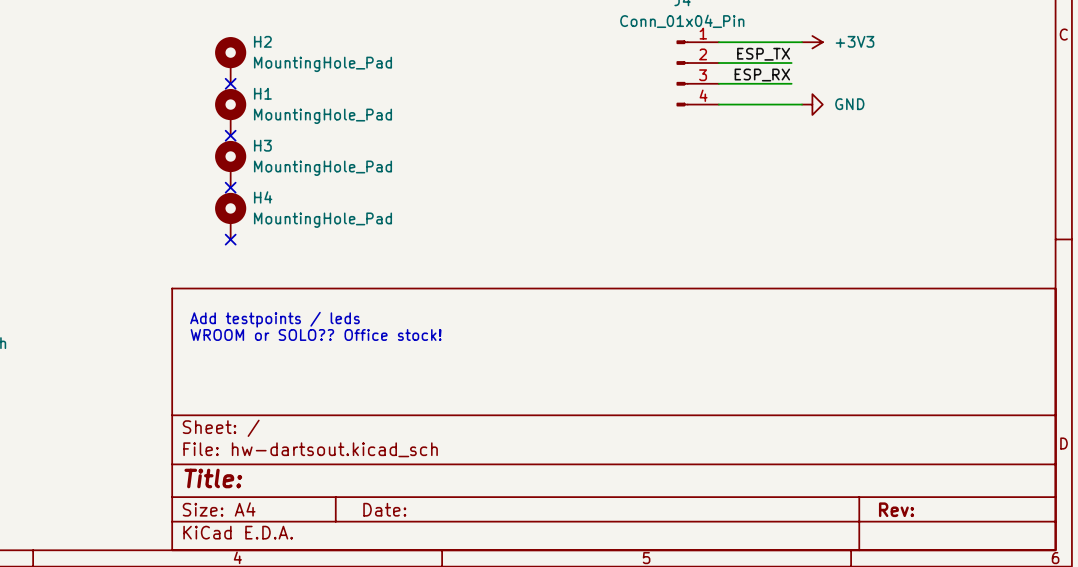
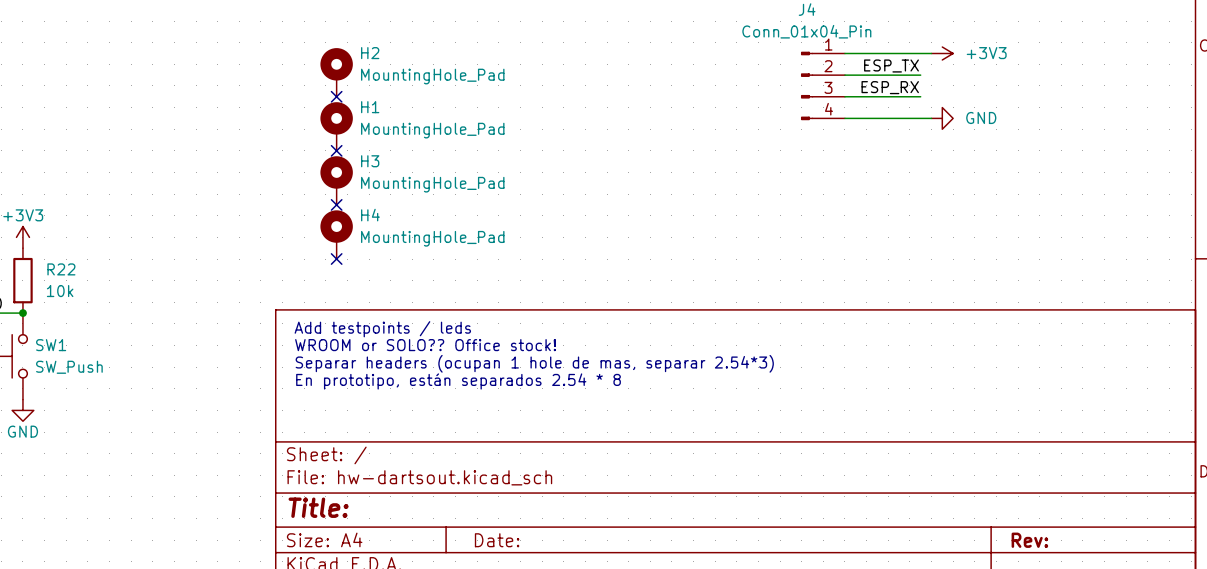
text: none -> Add testpoints / leds (382, 329)
text: Add testpoints / leds (275, 319) -> WROOM or SOLO?? Office stock! (425, 345)
text: WROOM or SOLO?? Office stock! (316, 334) -> Separar headers (ocupan 1 hole de mas, separar 2.54*3) (534, 363)
text: none -> En prototipo, están separados 2.54 * 8 (458, 381)

